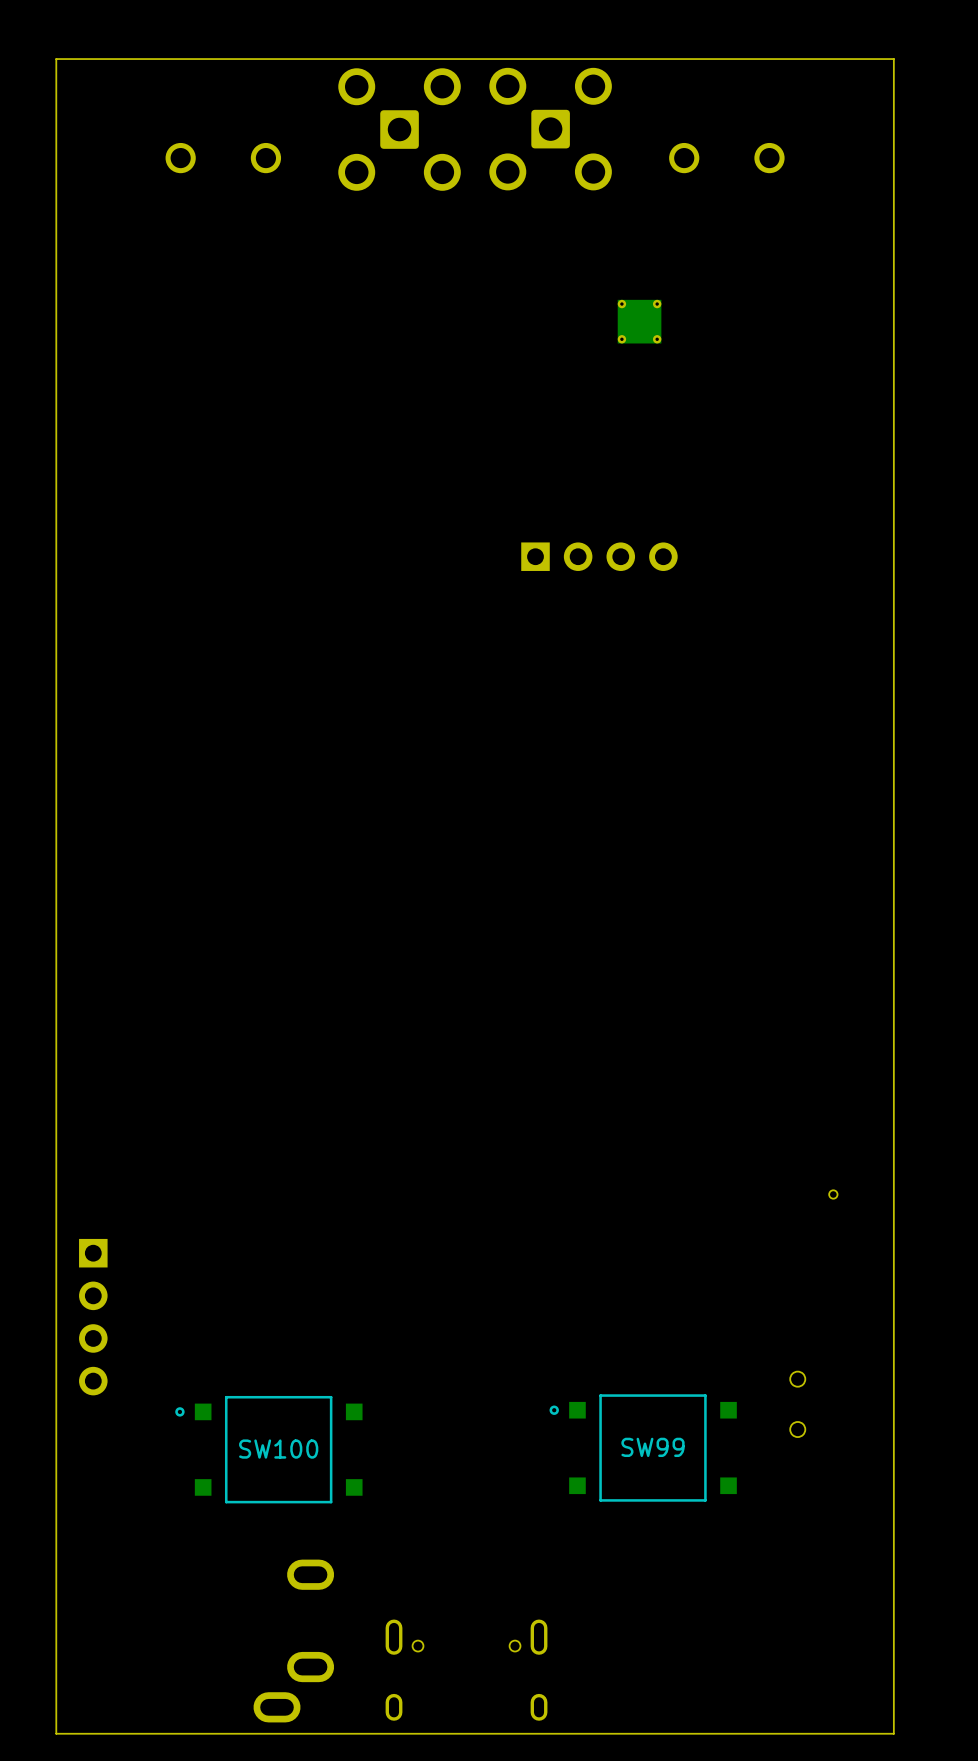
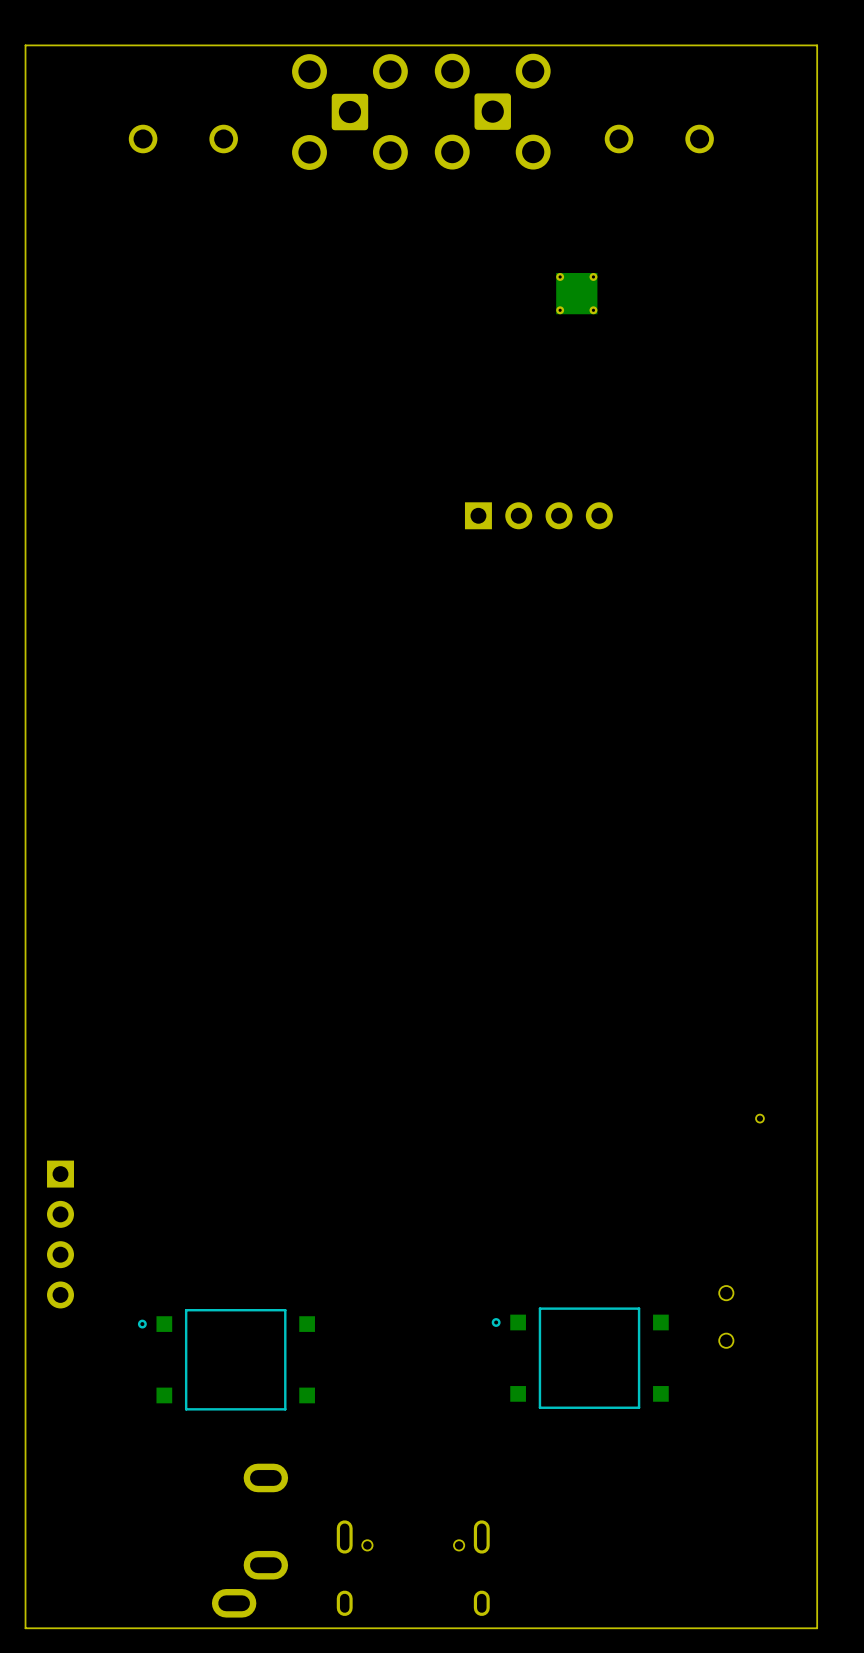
SW99 name: SW99 (653, 1447) -> none
SW100 name: SW100 (278, 1449) -> none

